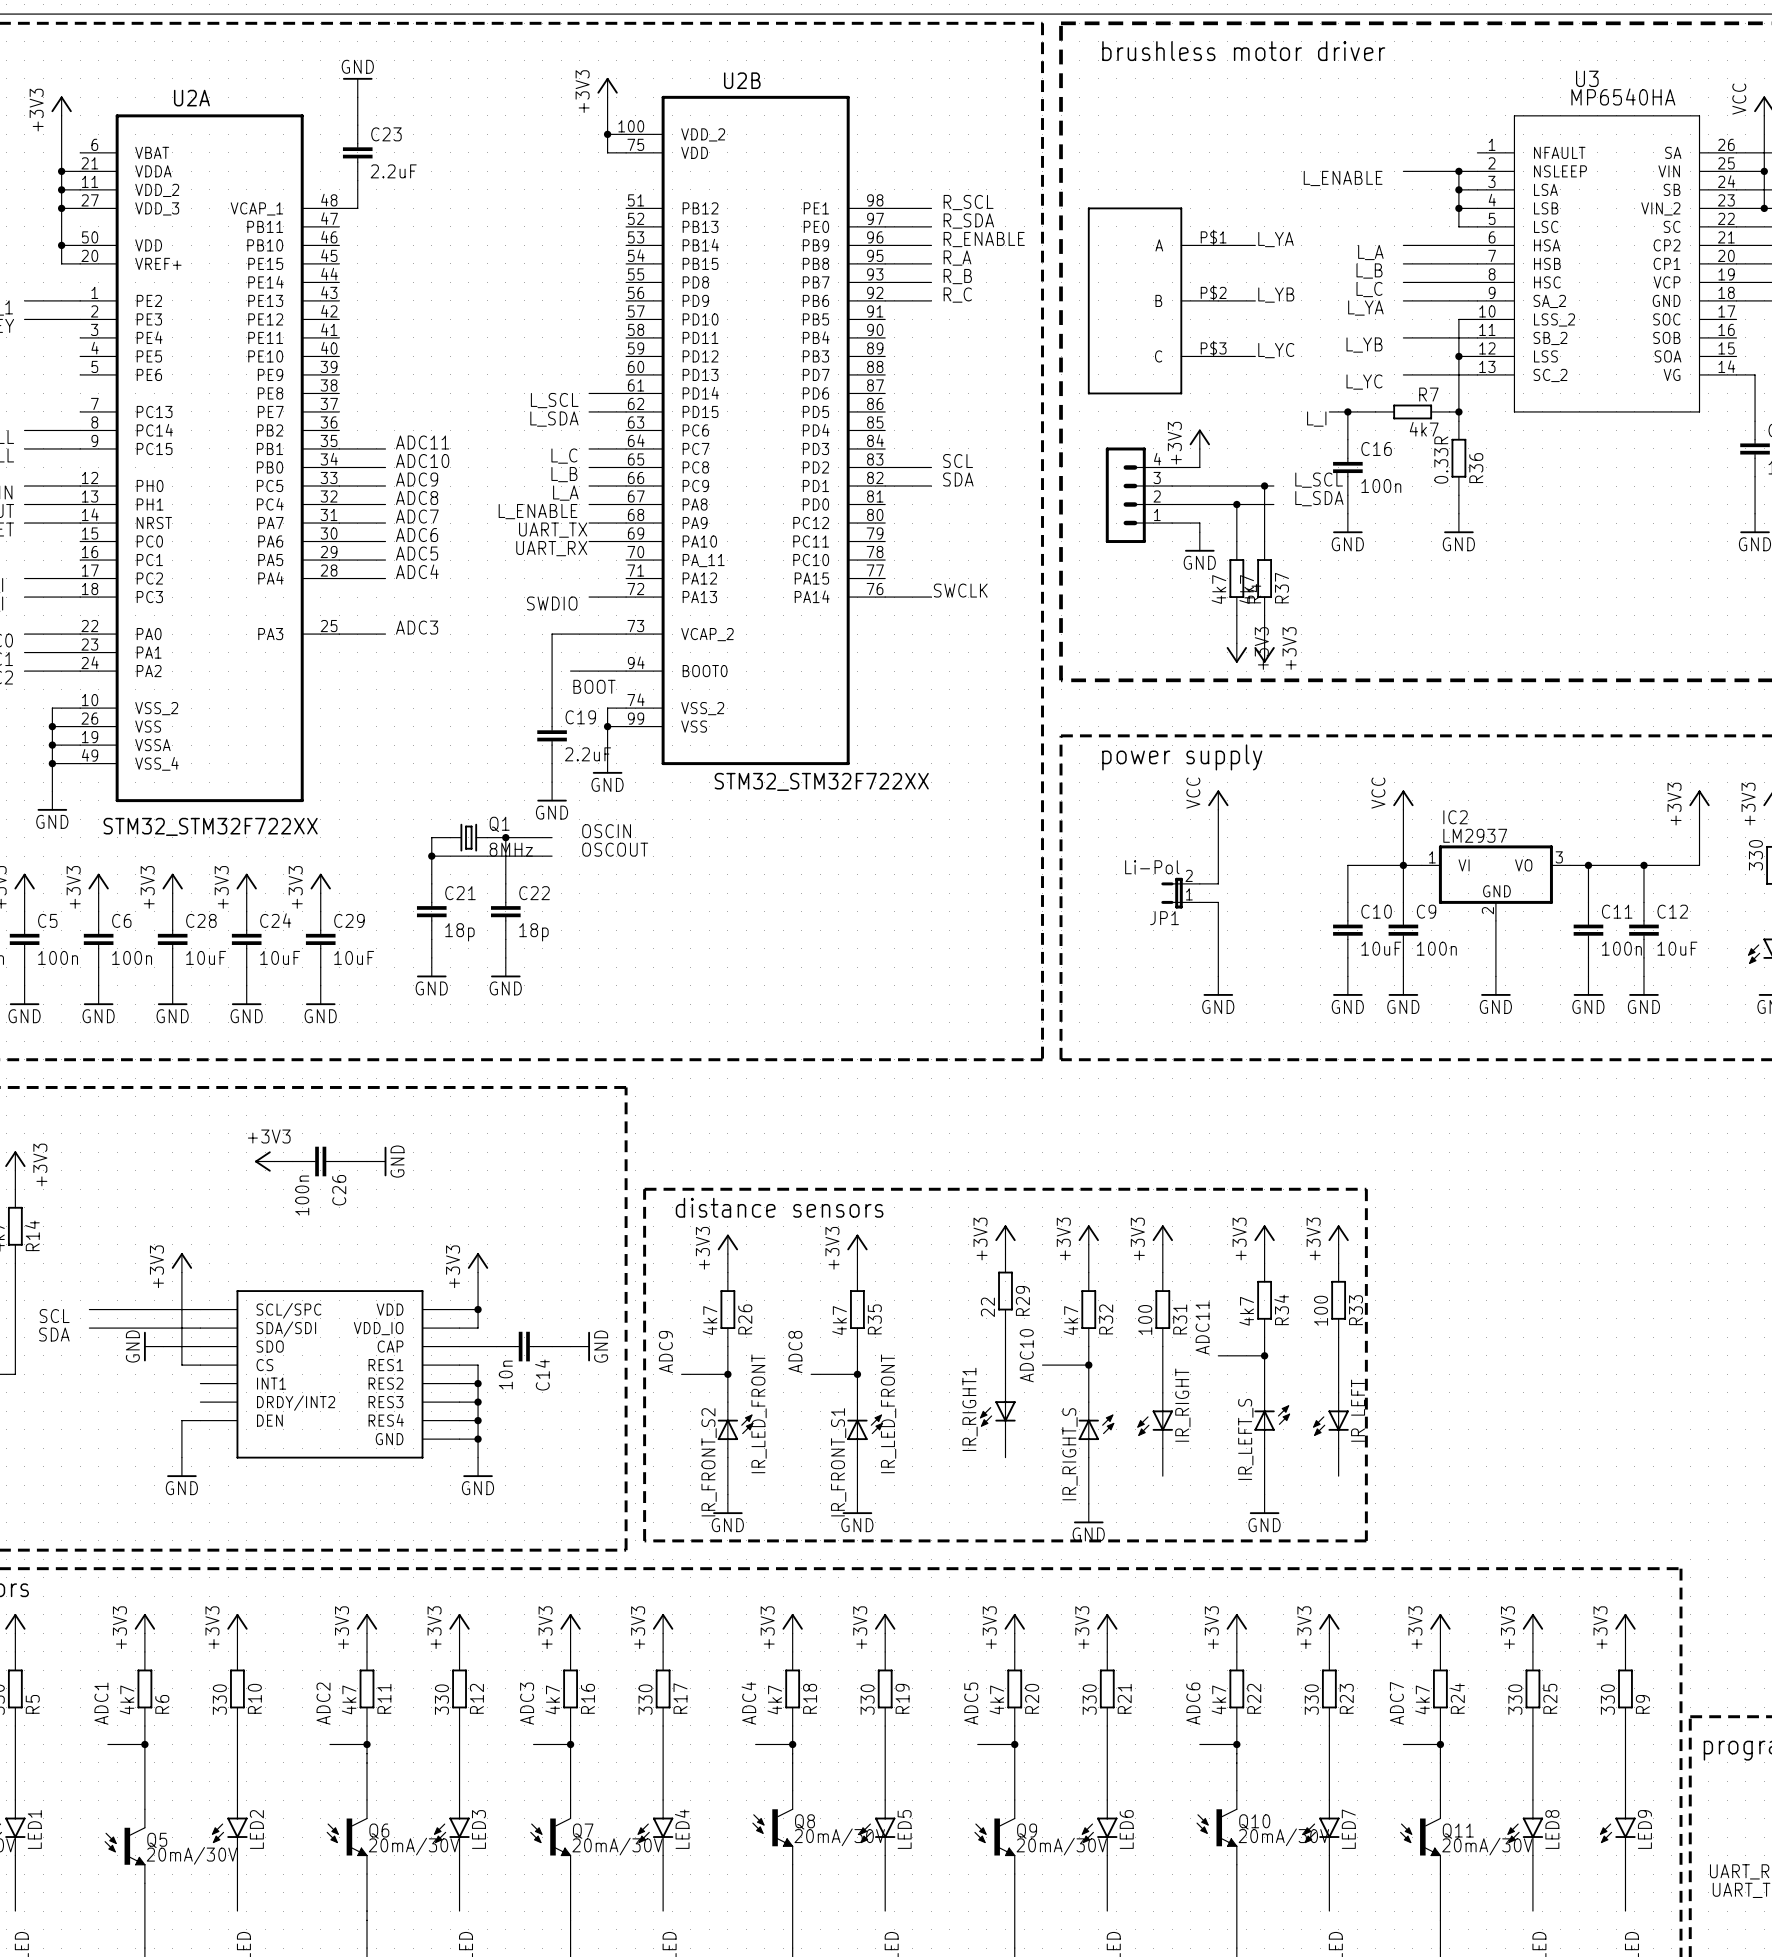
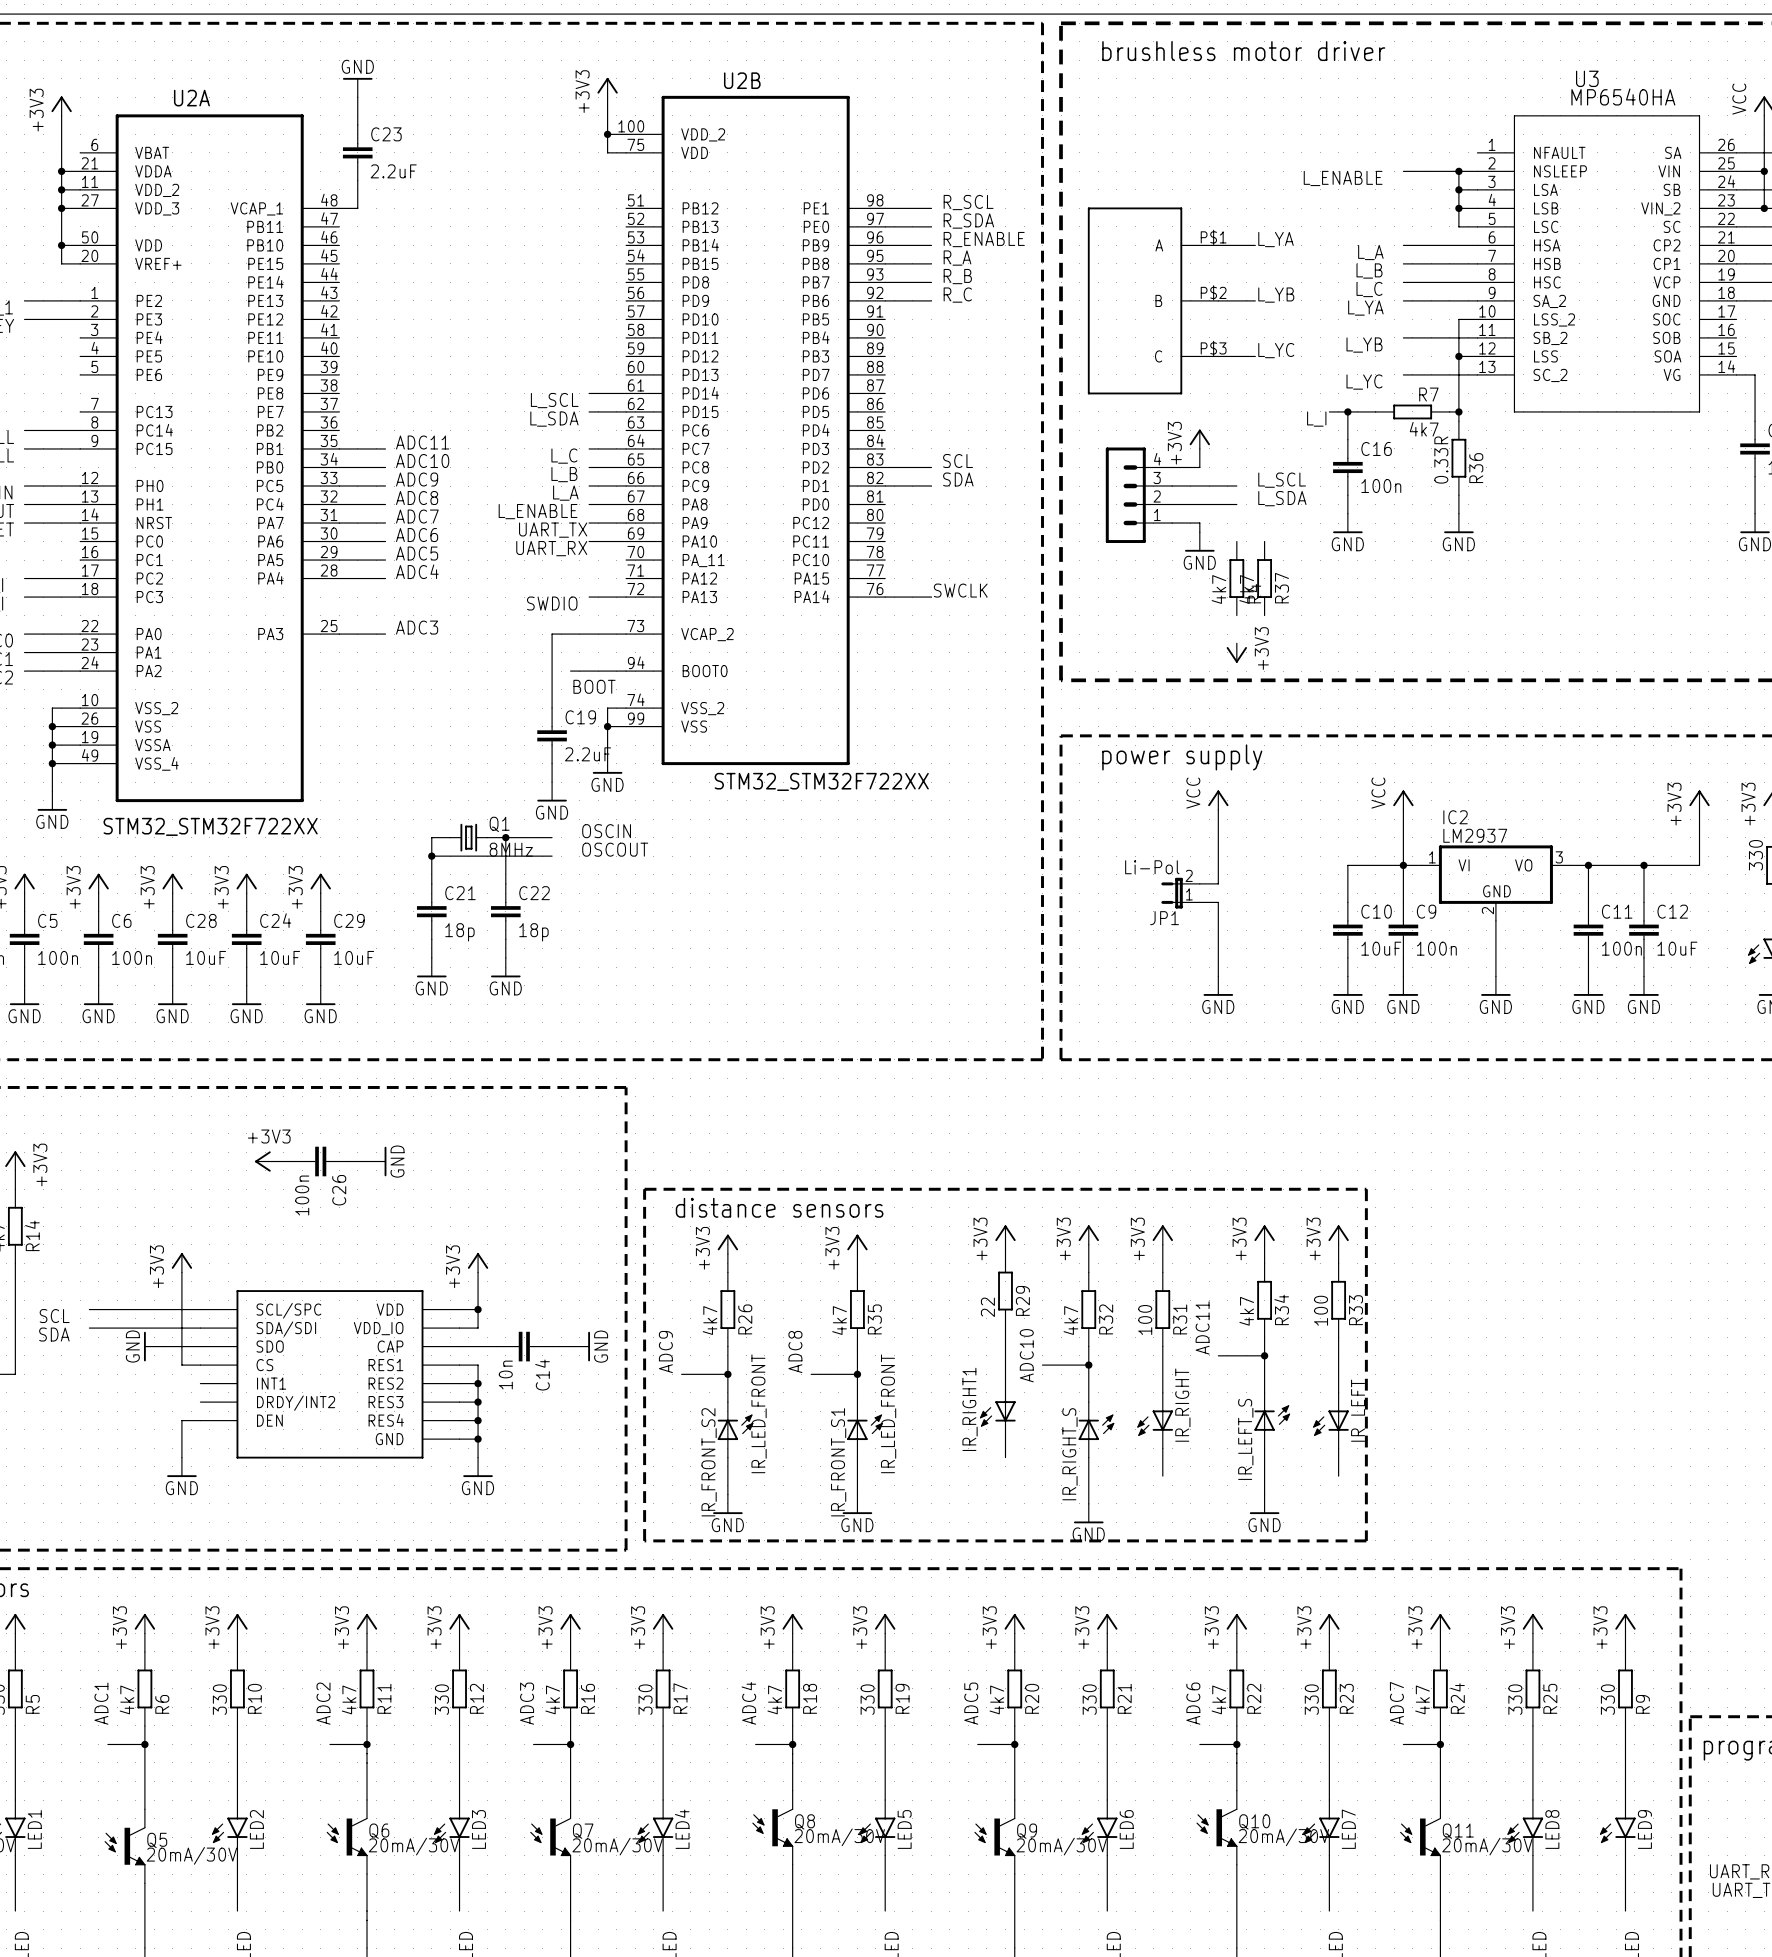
label position: L_SCL (1319, 480) -> L_SCL (1282, 480)
wire: (1236, 486) (1273, 486) -> none
wire: (1264, 486) (1264, 541) -> none
junction: (1264, 486) -> none
label position: L_SDA (1319, 498) -> L_SDA (1282, 498)
junction: (1236, 504) -> none
wire: (1273, 504) (1236, 504) (1236, 541) -> none
wire: (1236, 615) (1236, 643) -> none
wire: (1264, 615) (1264, 643) -> none
power symbol: +3V3 (1264, 653) -> none

